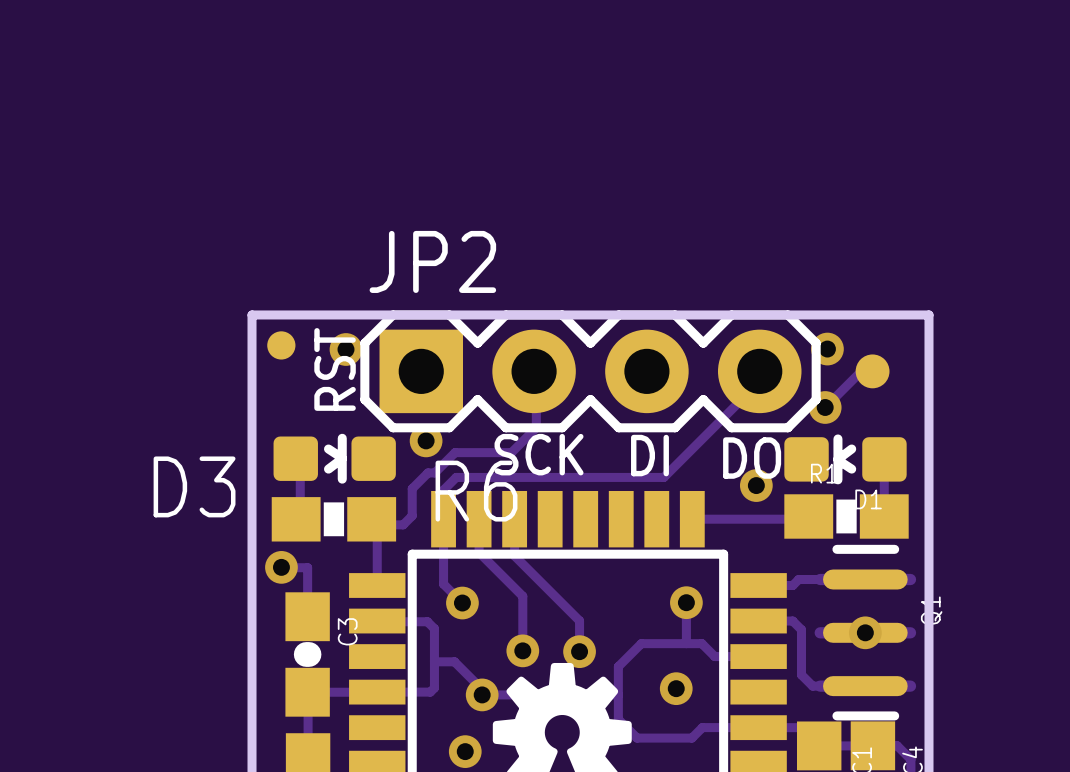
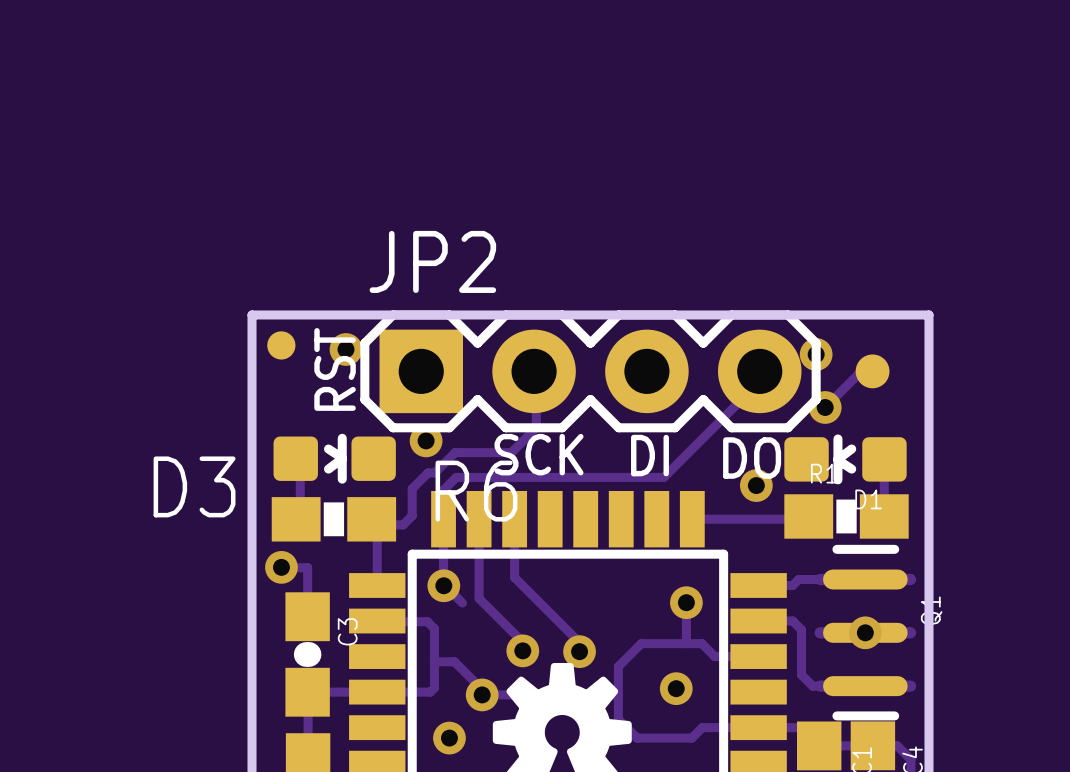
via position: (827, 349) -> (816, 354)
track: (479, 552) (522, 596) (522, 650) -> (479, 552) (479, 598) (534, 653)
track: (514, 555) (579, 620) (579, 651) -> (514, 555) (514, 577) (590, 653)
via position: (462, 603) -> (443, 585)
via position: (465, 751) -> (449, 738)

